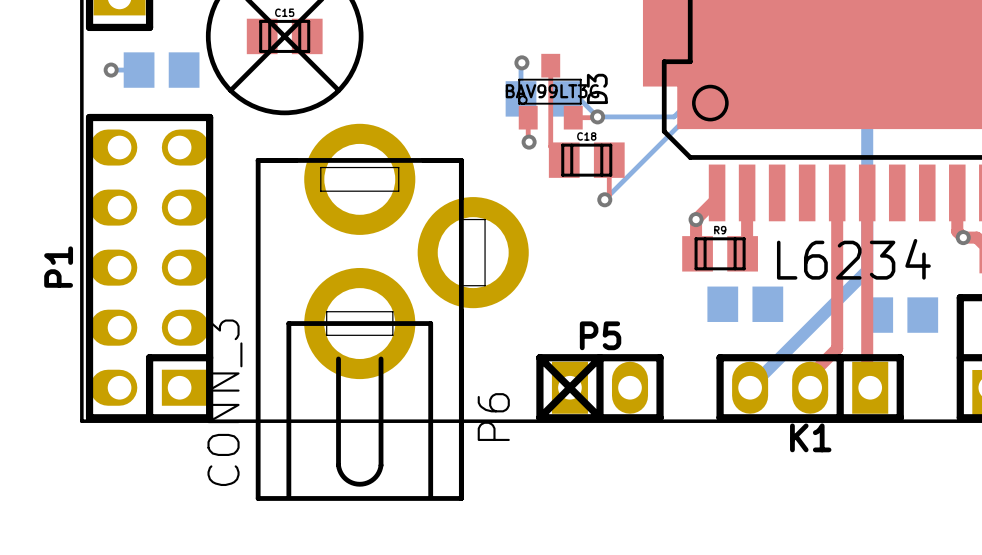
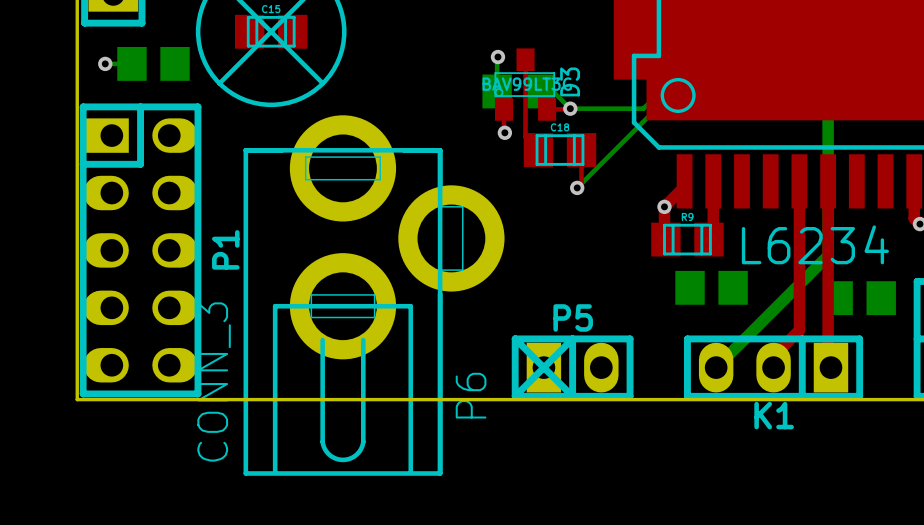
P1 rotation: 0° (149, 267) -> 180° (140, 250)

